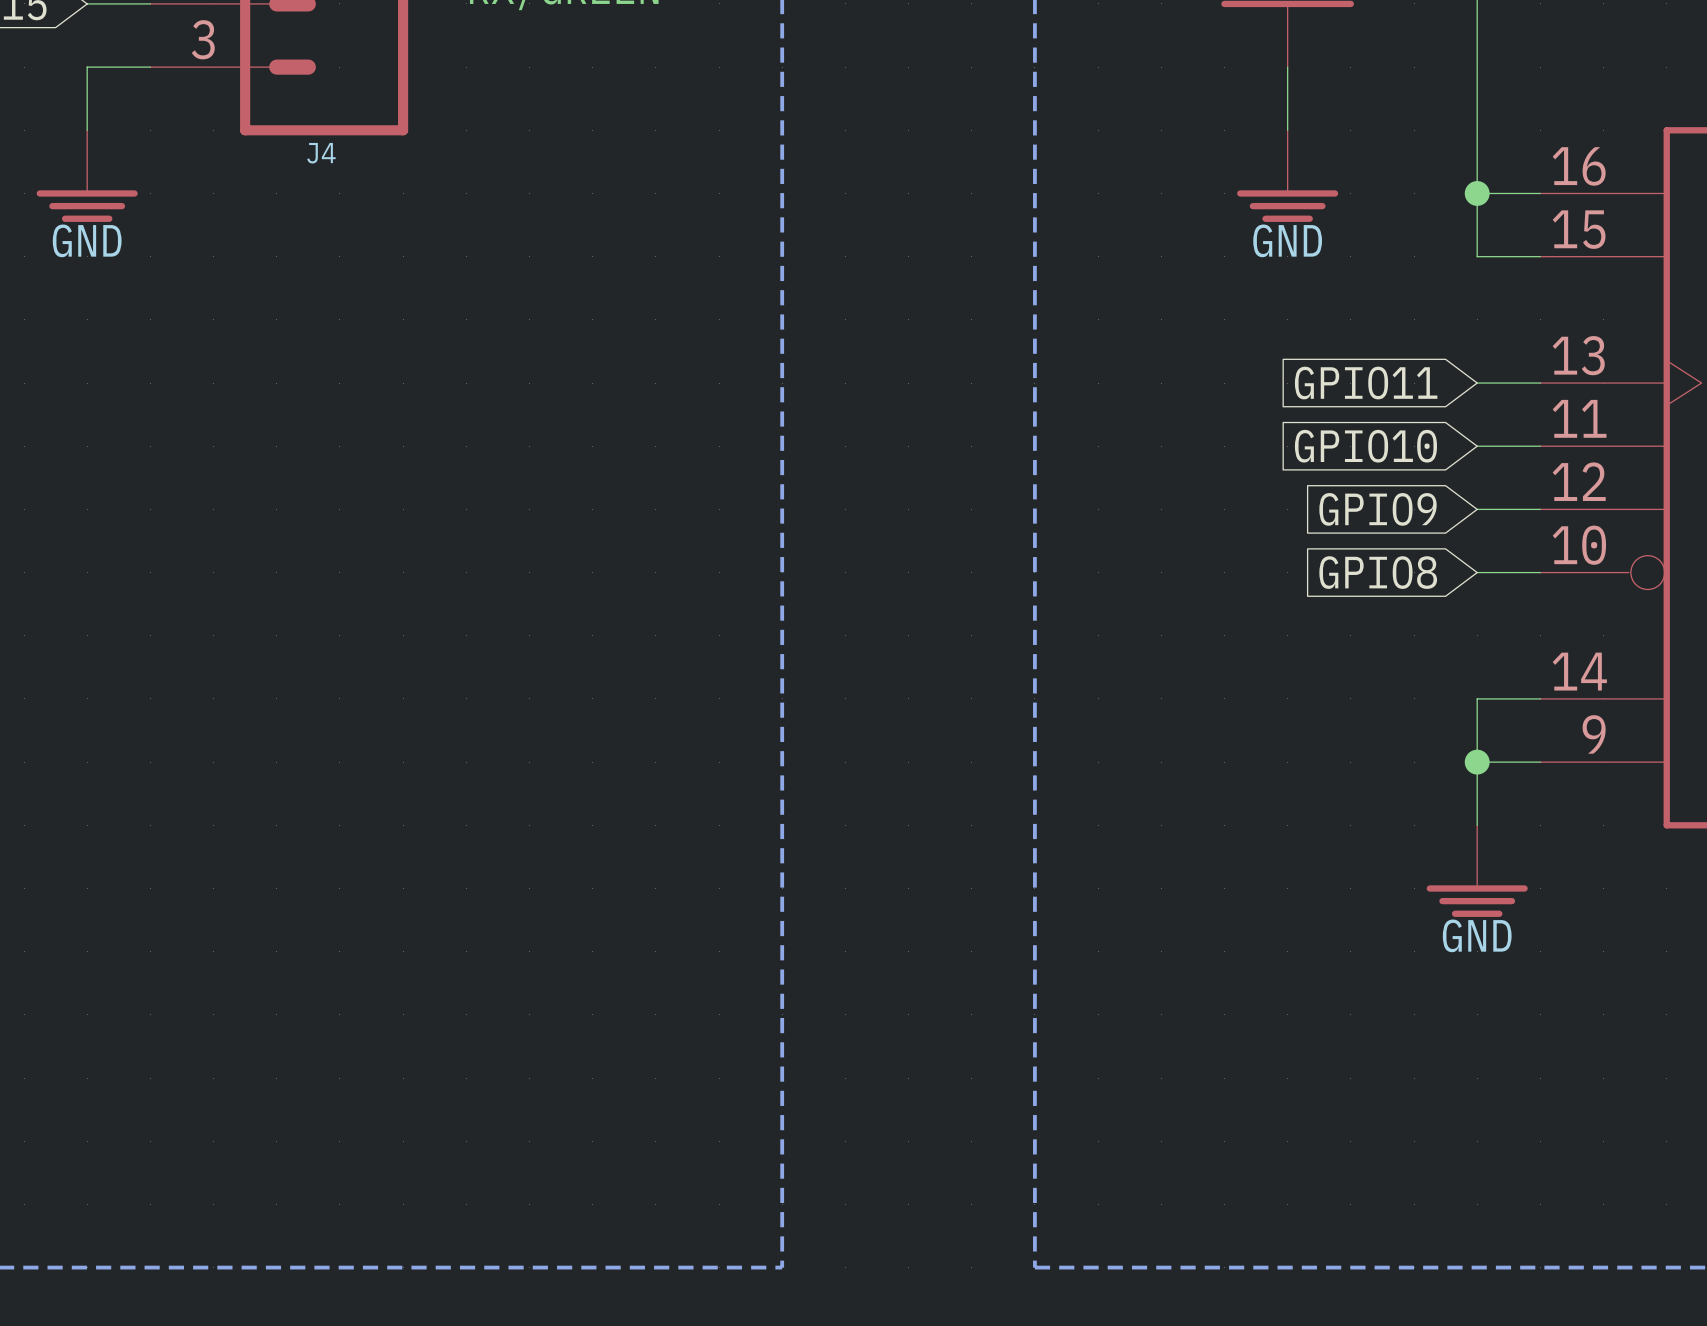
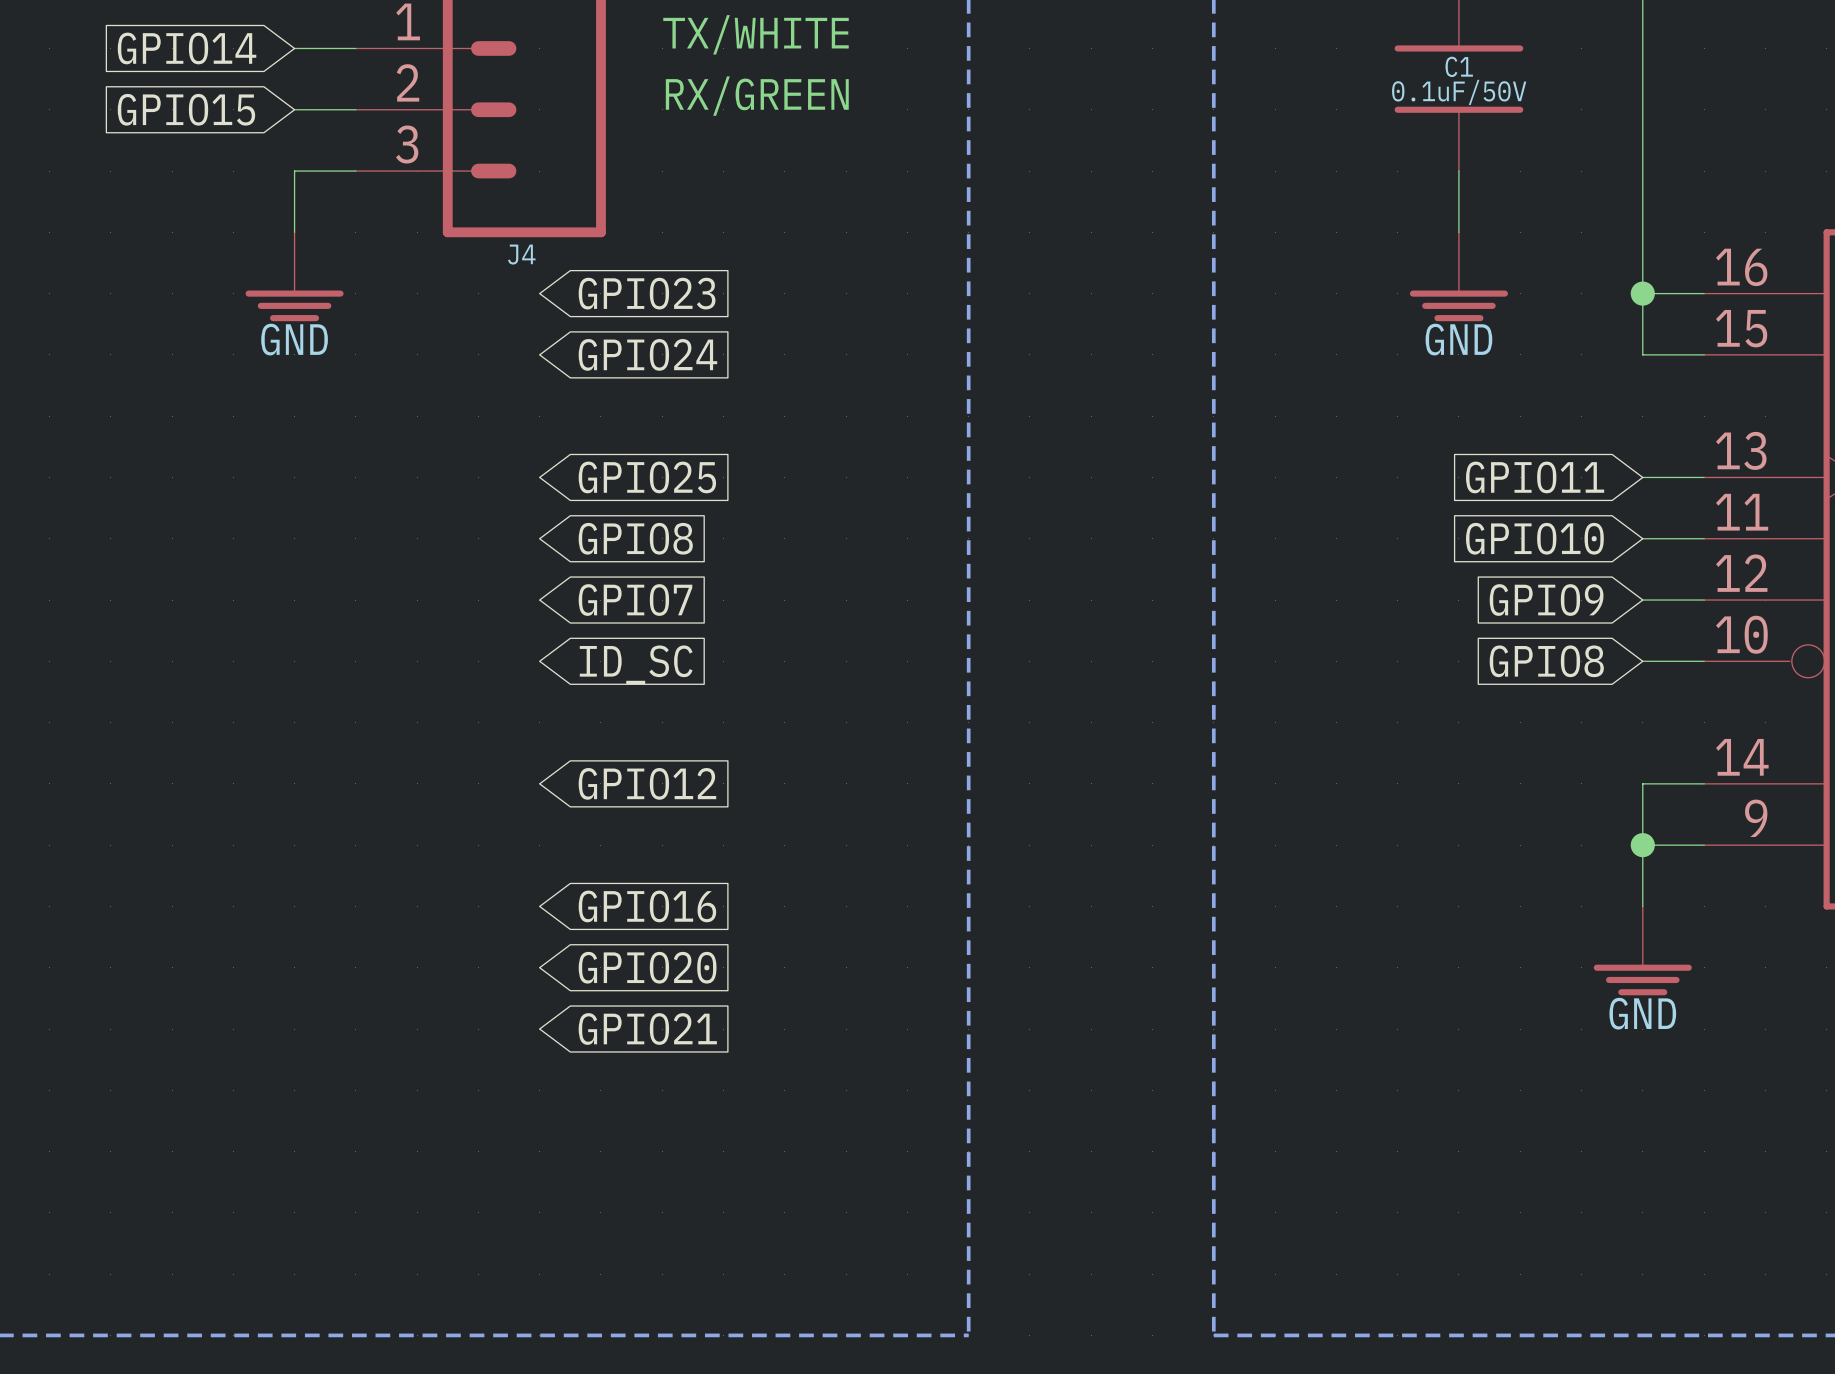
global label: none -> GPIO23 (647, 293)
global label: none -> GPIO24 (647, 354)
global label: none -> GPIO25 (647, 477)
global label: none -> GPIO8 (635, 538)
global label: none -> GPIO7 (635, 600)
global label: none -> ID_SC (636, 664)
global label: none -> GPIO12 (647, 783)
global label: none -> GPIO16 (647, 906)
global label: none -> GPIO20 (647, 967)
global label: none -> GPIO21 (647, 1029)

